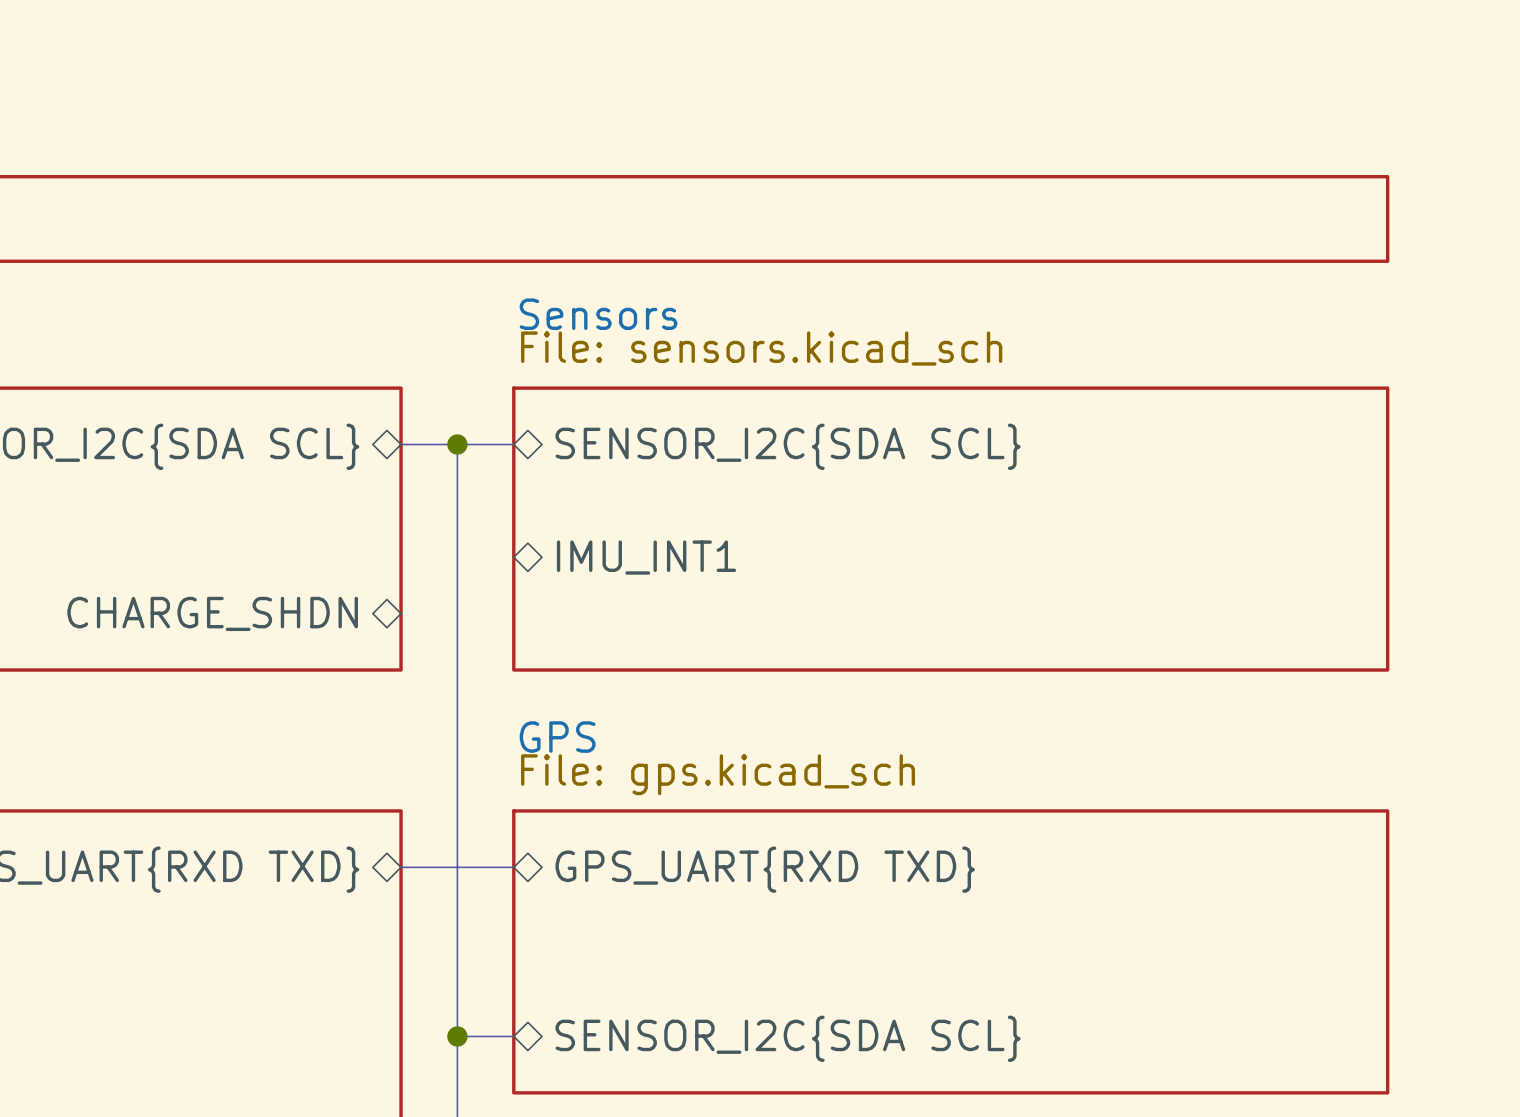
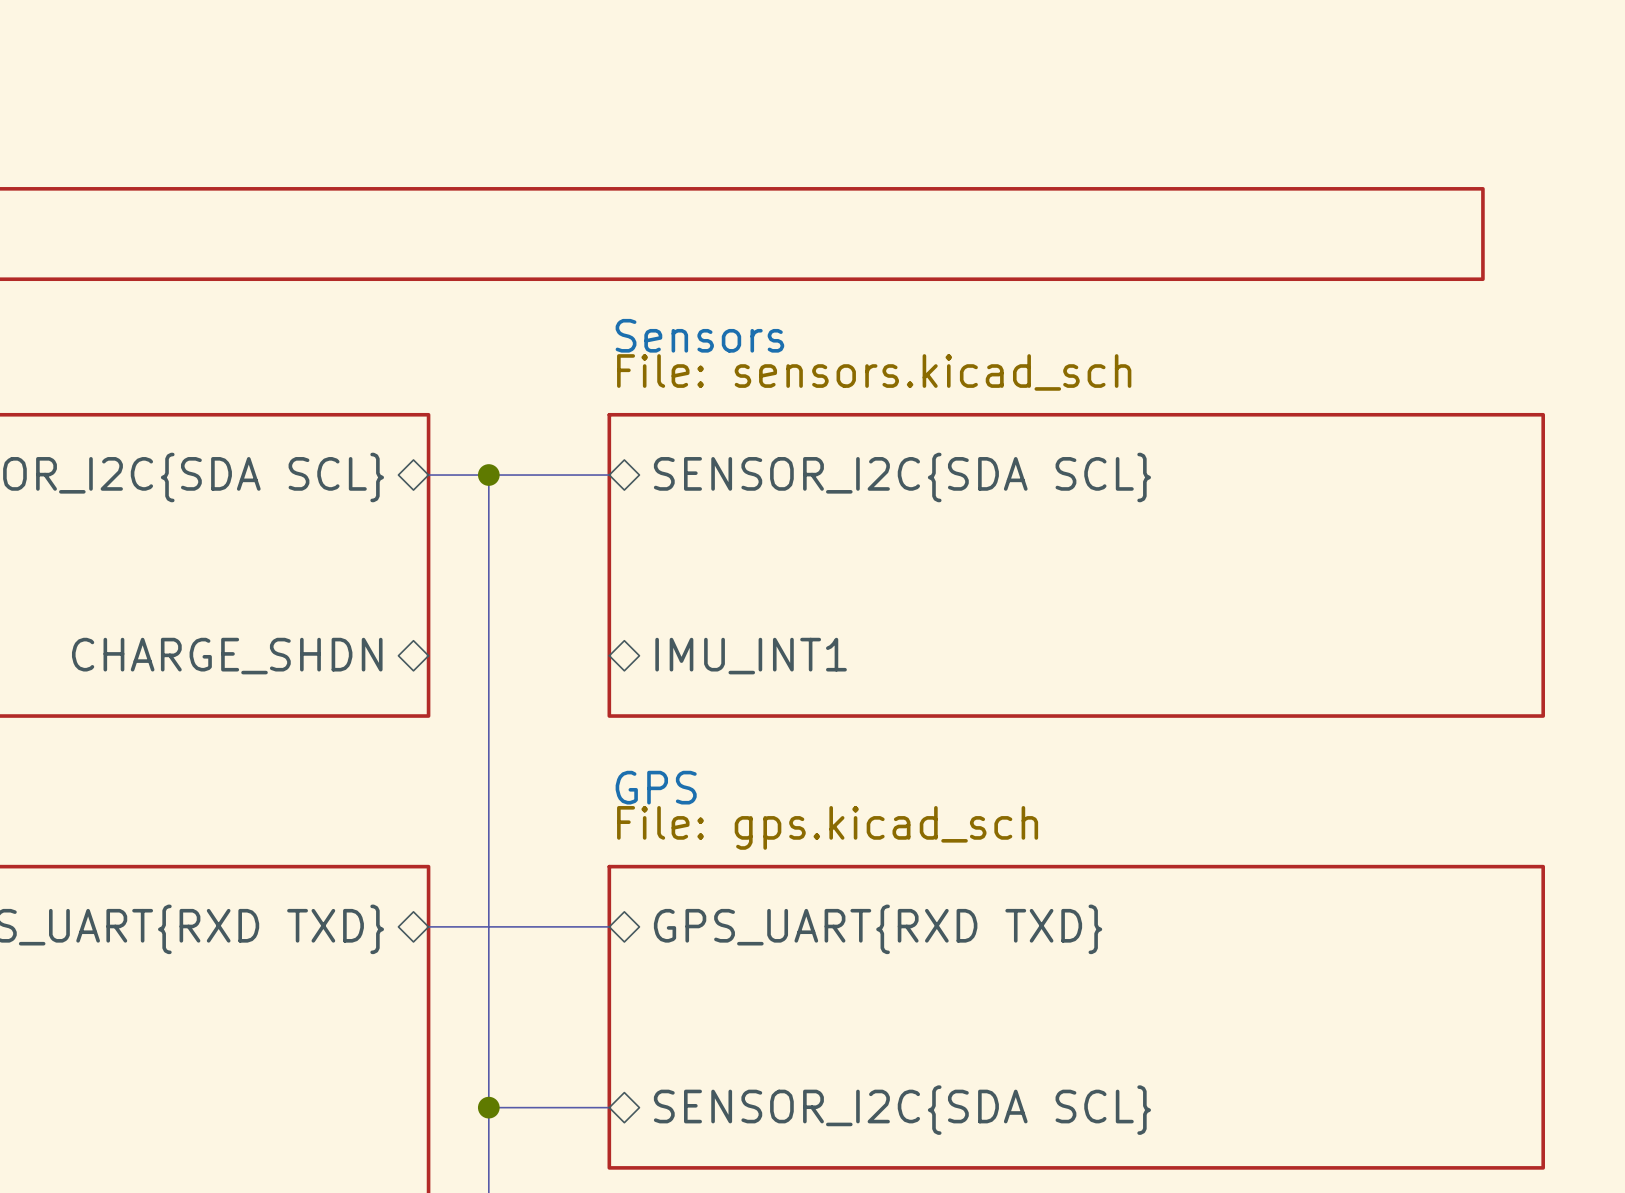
bus: none -> (549, 475) (609, 475)
sheet pin position: SENSOR_I2C{SDA SCL} (788, 446) -> SENSOR_I2C{SDA SCL} (902, 477)
sheet Sensors position: (950, 529) -> (1076, 565)
sheet pin position: IMU_INT1 (646, 557) -> IMU_INT1 (751, 656)
bus: none -> (549, 926) (609, 926)
sheet pin position: GPS_UART{RXD TXD} (765, 869) -> GPS_UART{RXD TXD} (878, 929)
sheet GPS position: (950, 951) -> (1076, 1017)
bus: none -> (549, 1107) (609, 1107)
sheet pin position: SENSOR_I2C{SDA SCL} (788, 1038) -> SENSOR_I2C{SDA SCL} (902, 1110)

